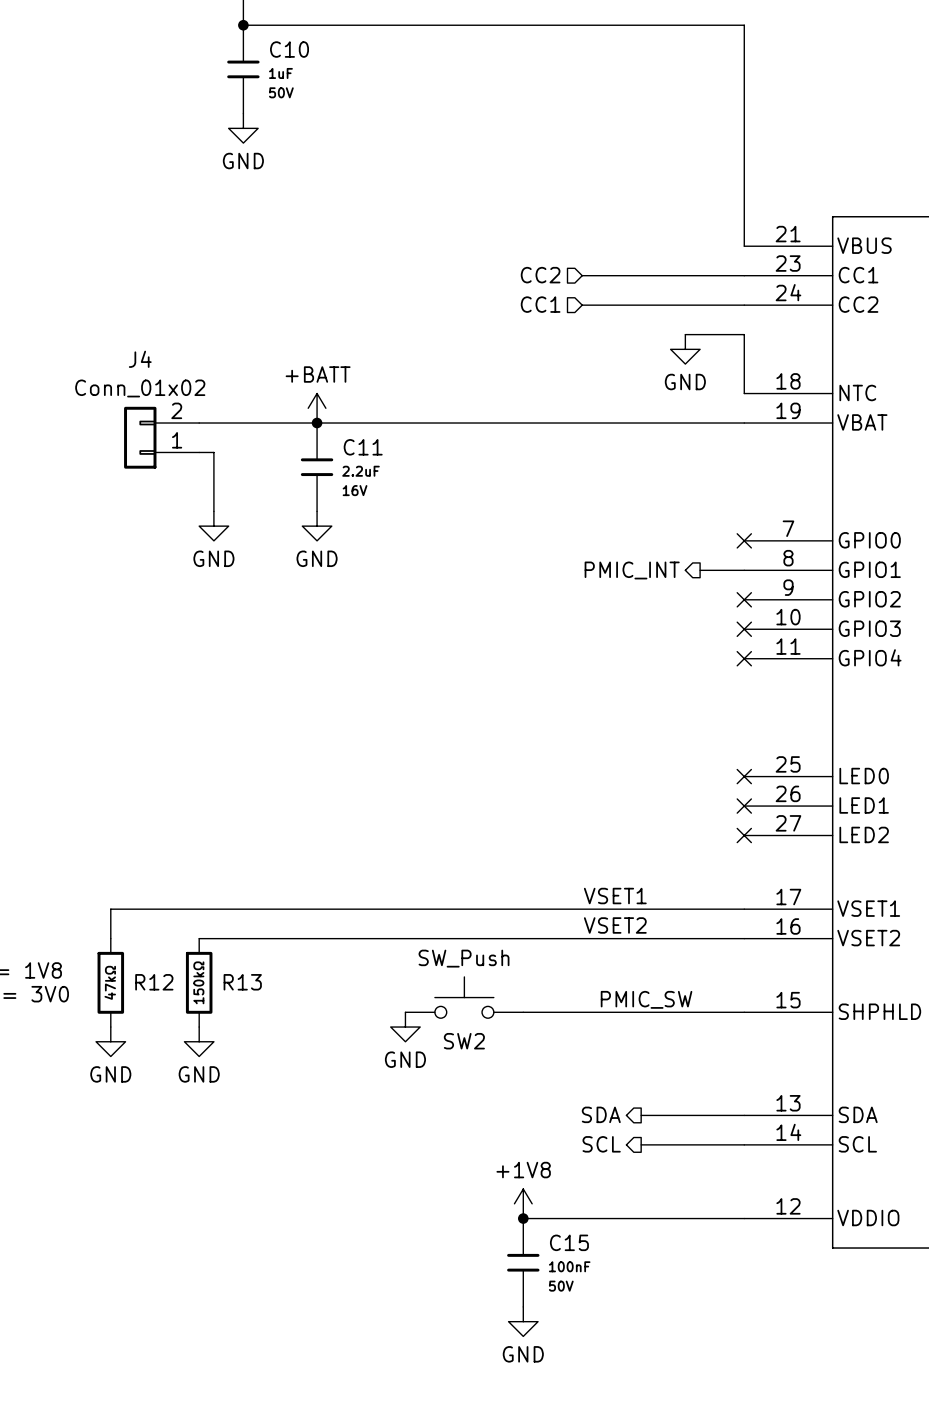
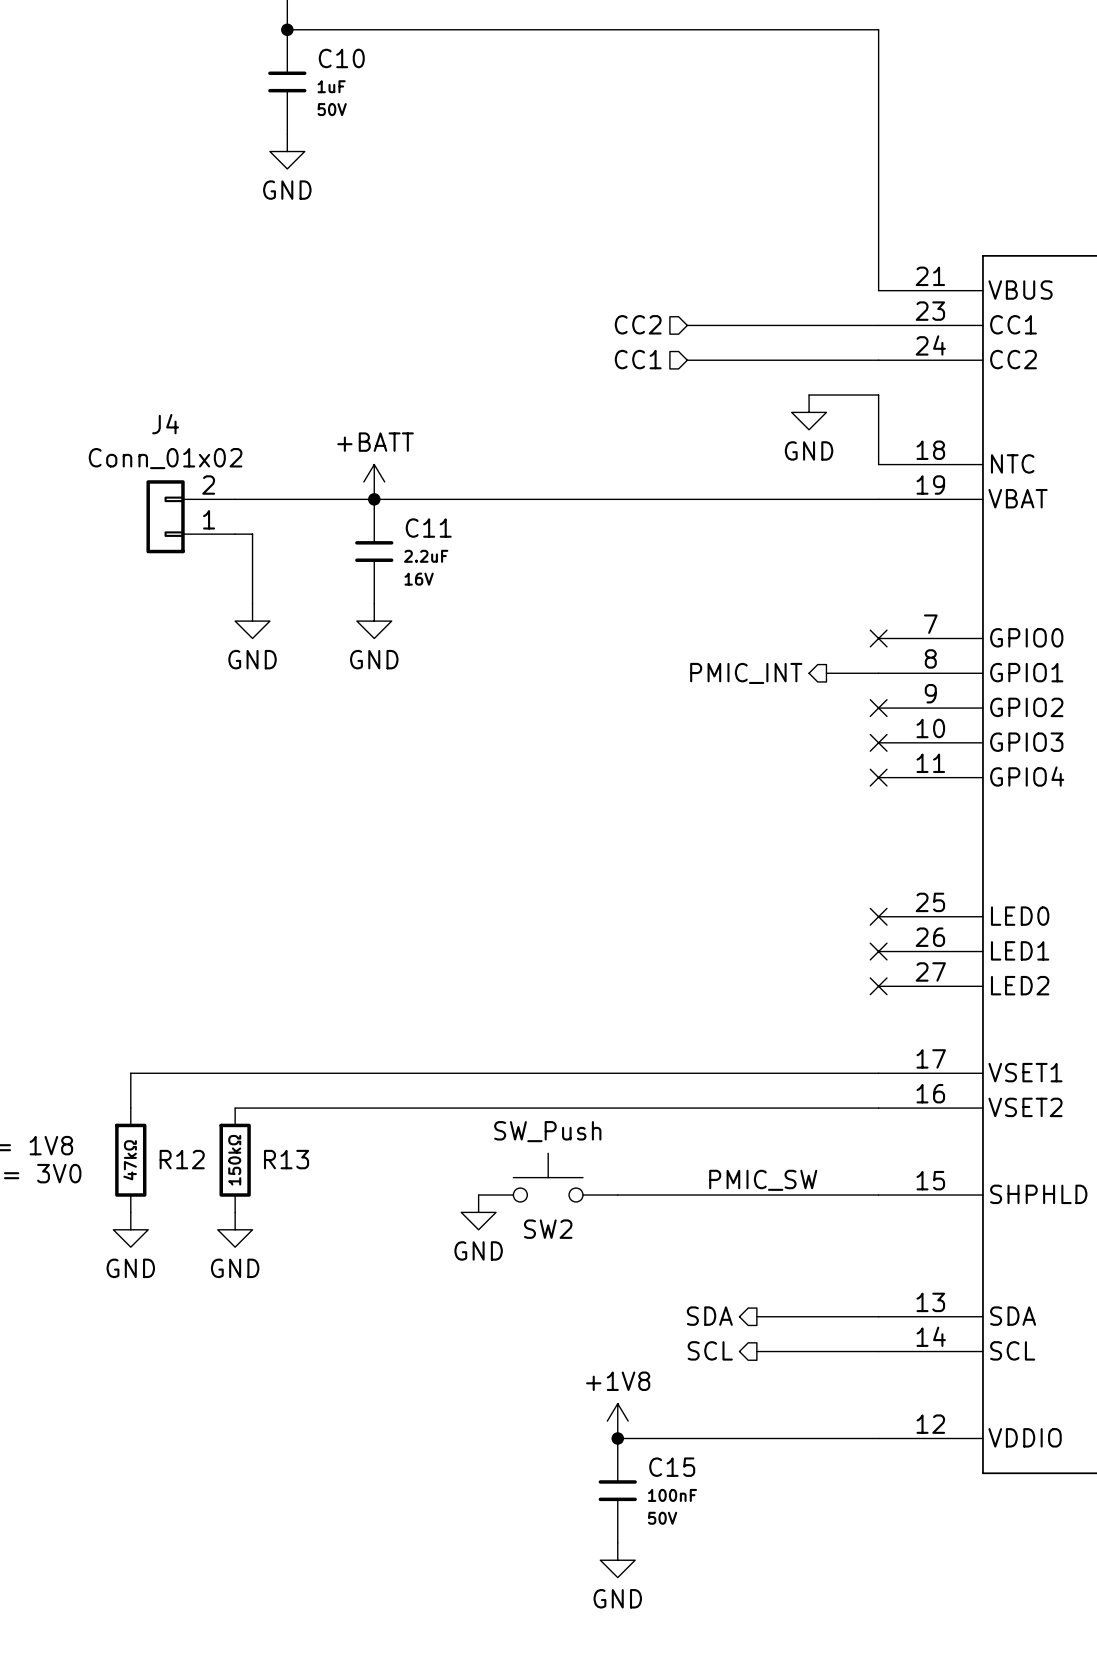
label: VSET1 (615, 896) -> none
label: VSET2 (615, 925) -> none

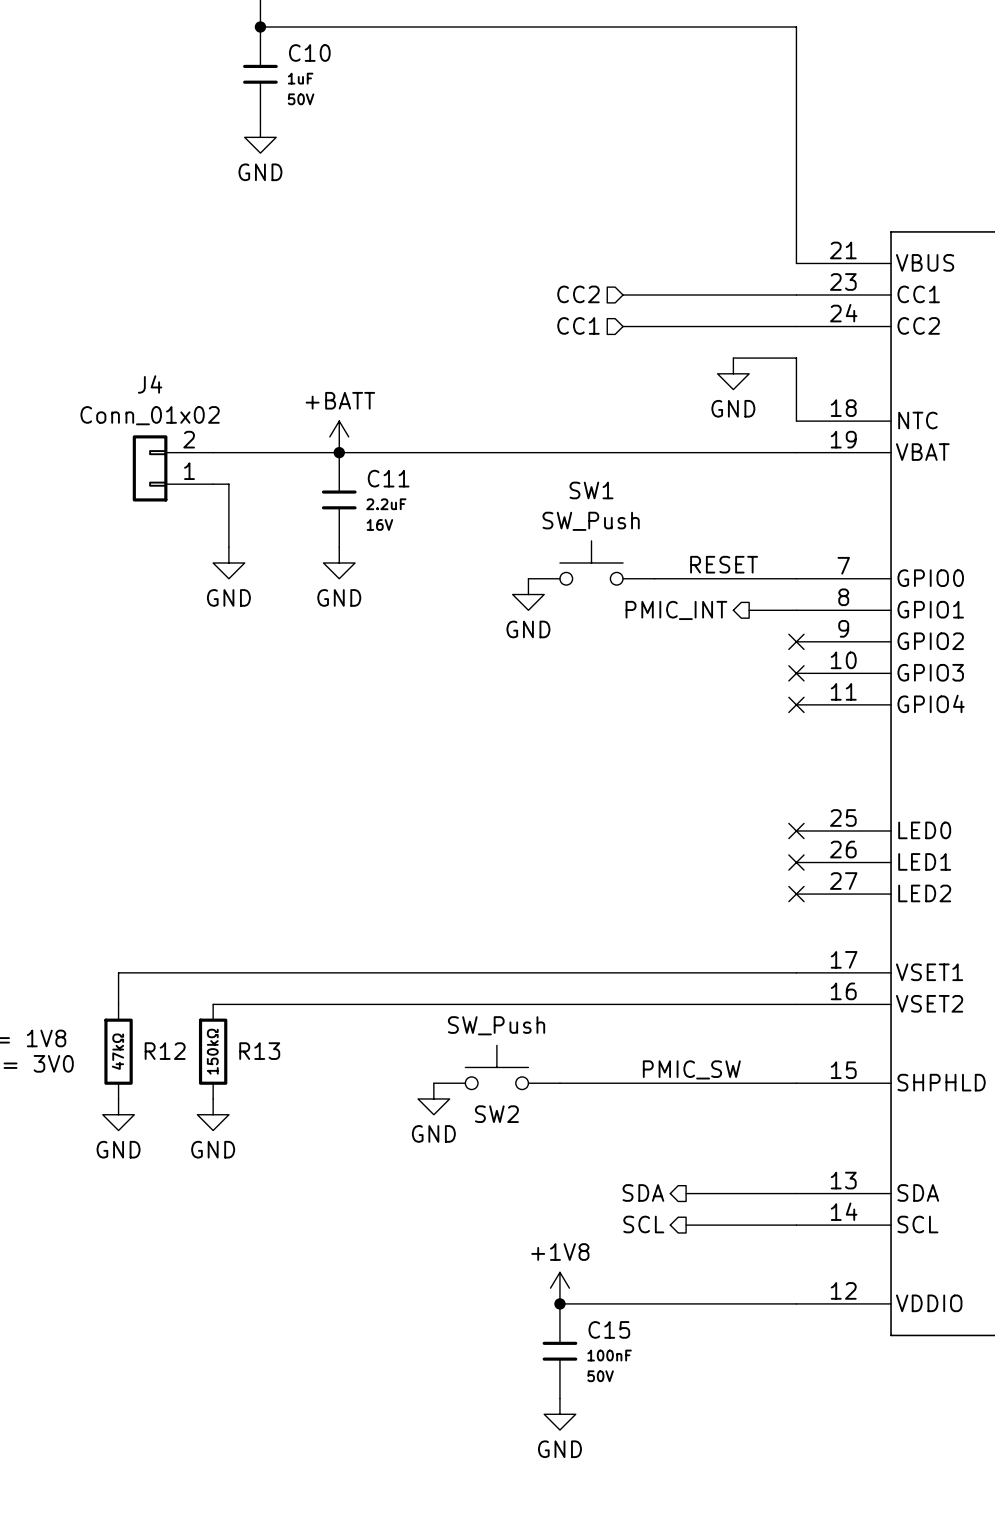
SW1: none -> SW_Push (591, 562)
label: none -> RESET (724, 564)
wire: none -> (654, 578) (796, 578)
no-connect mark: (878, 638) -> none
power symbol: none -> GND (528, 594)

